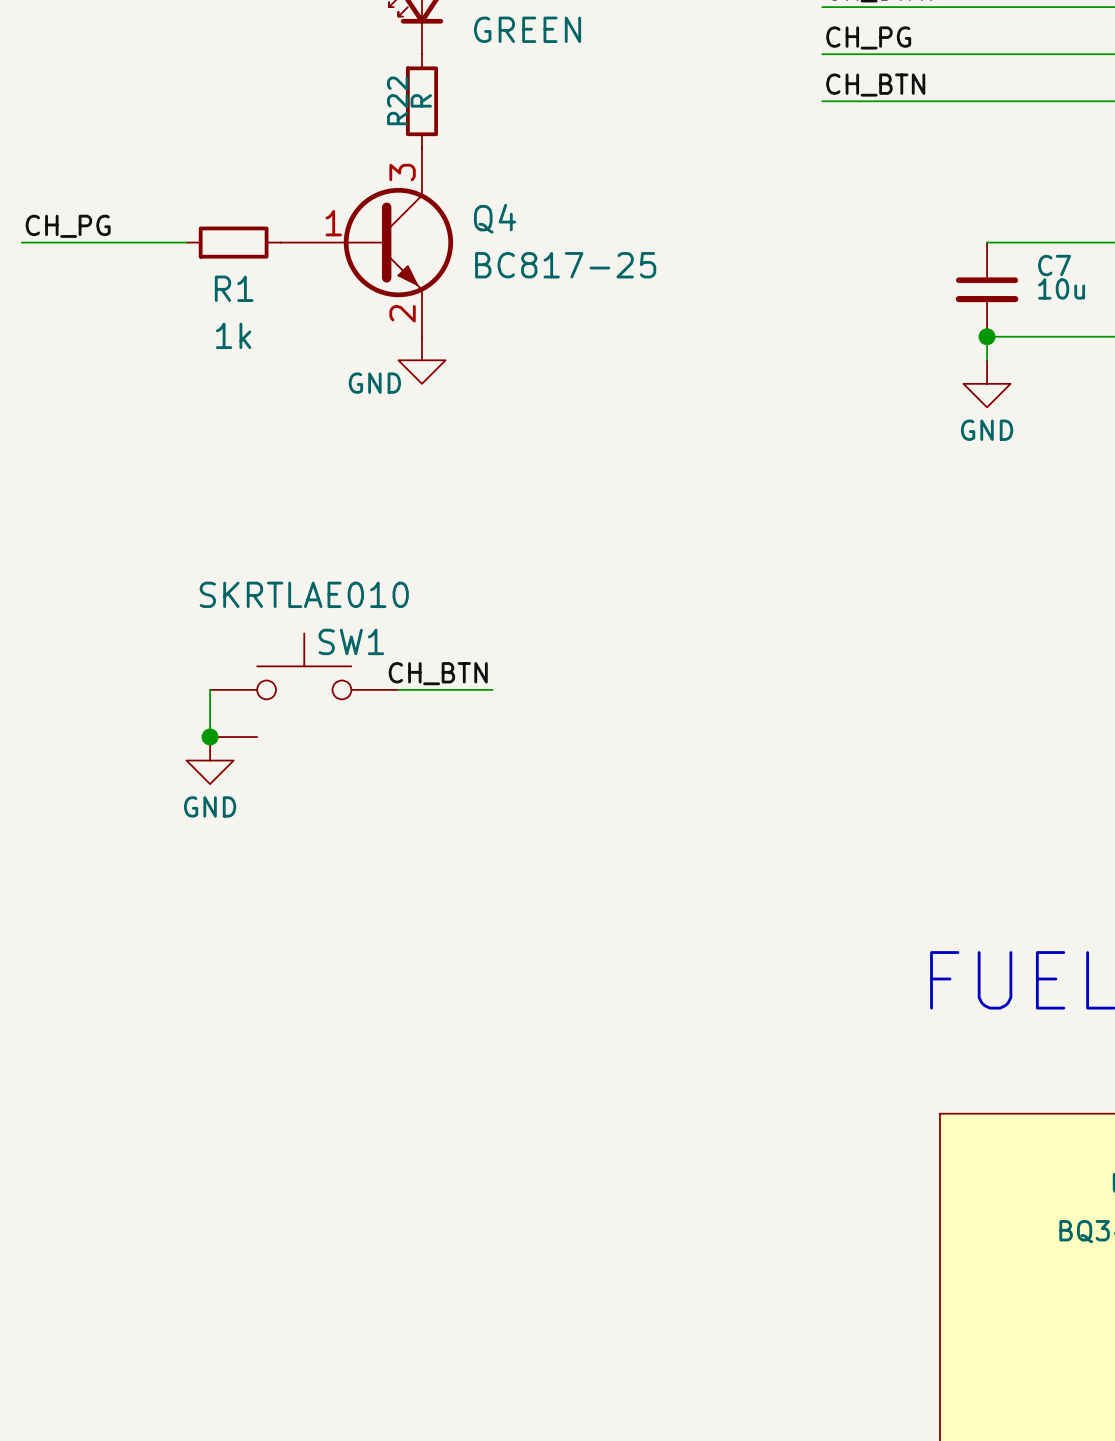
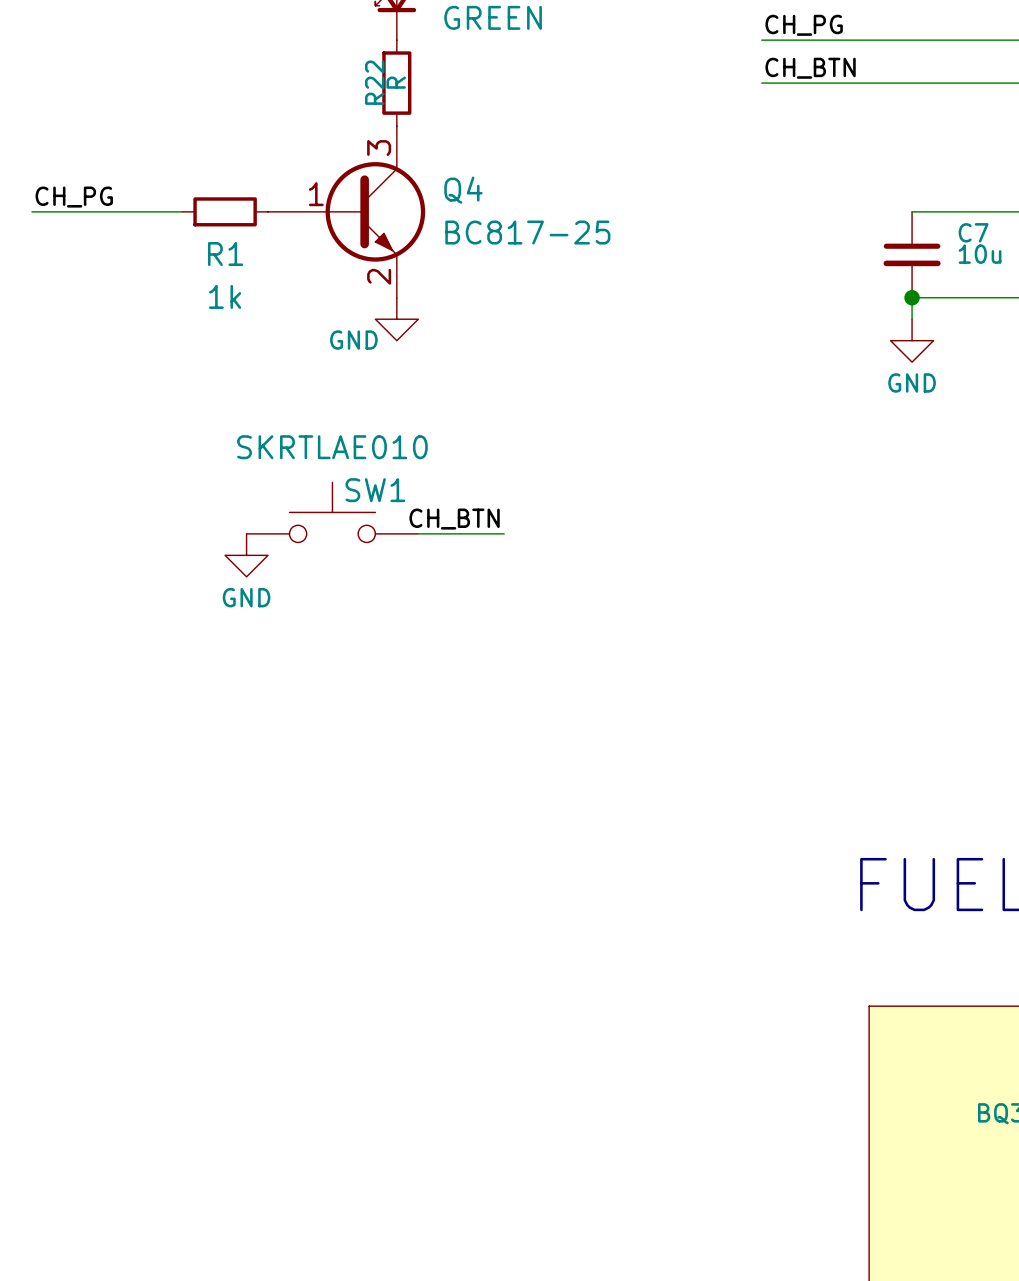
SW1 symbol: [210, 633, 399, 738] -> [246, 482, 419, 543]
label position: CH_BTN (438, 673) -> CH_BTN (454, 519)
wire: (210, 689) (210, 737) -> none
wire: (398, 689) (492, 689) -> (418, 533) (504, 533)
junction: (210, 737) -> none
power symbol position: GND (210, 760) -> GND (246, 555)

